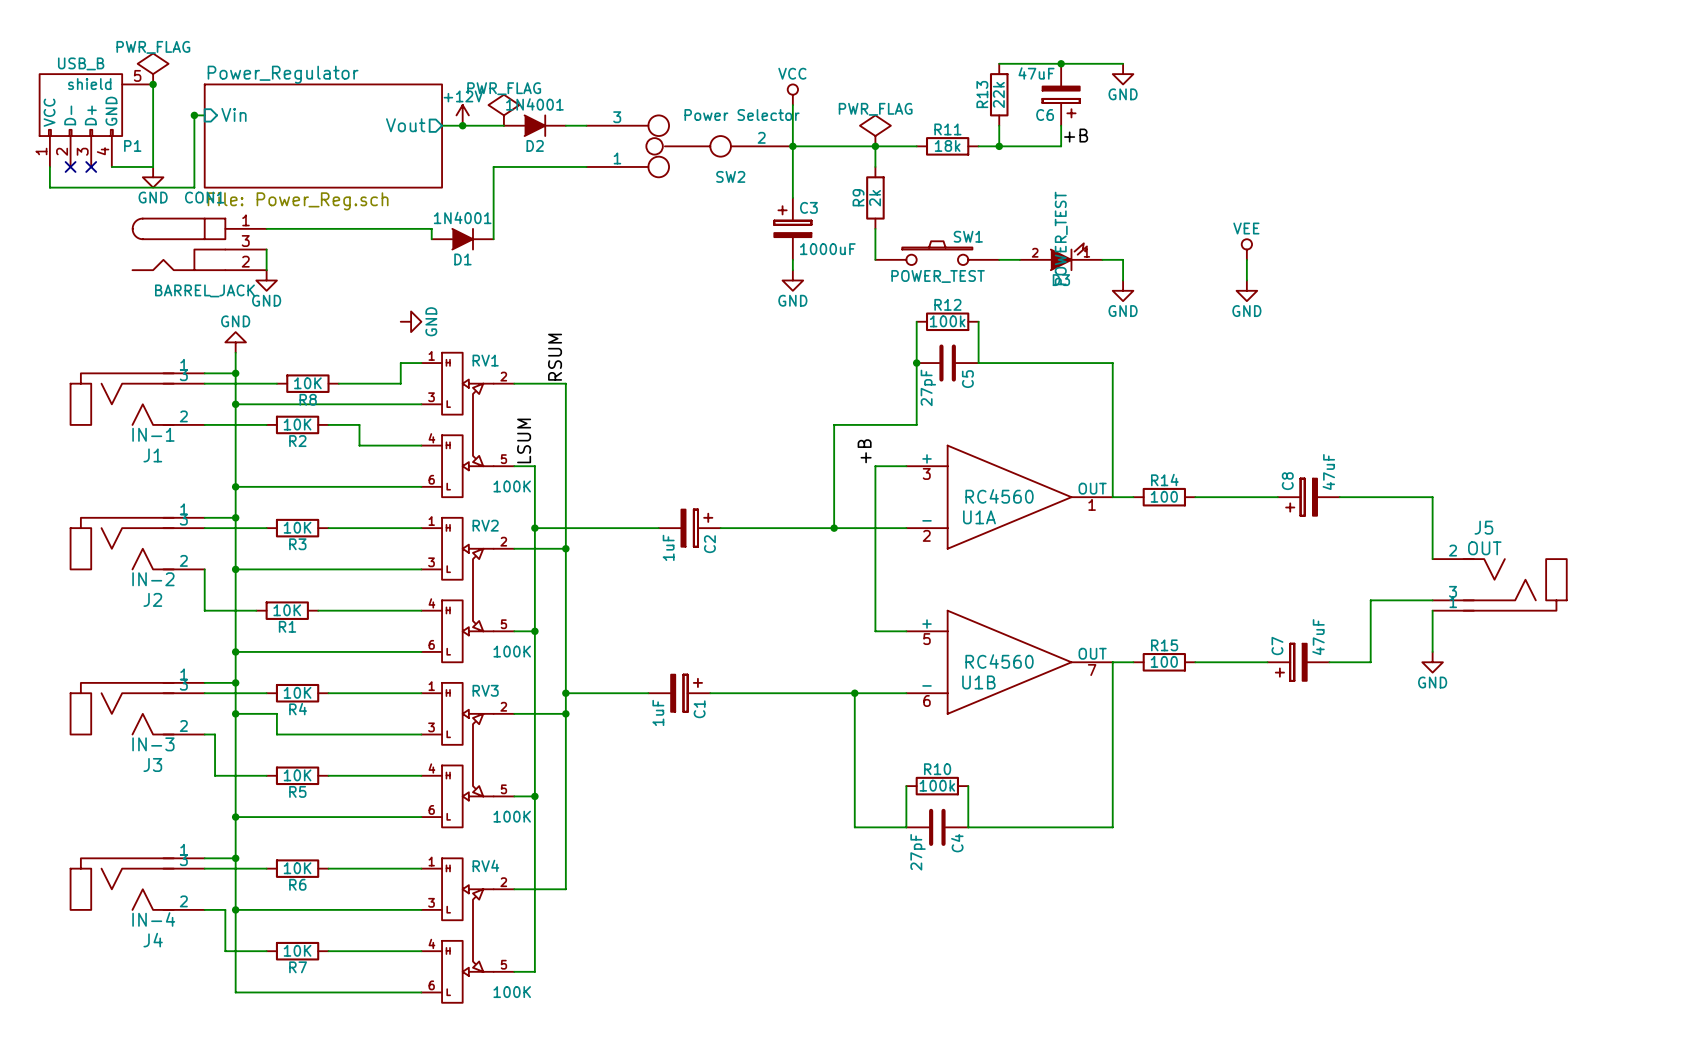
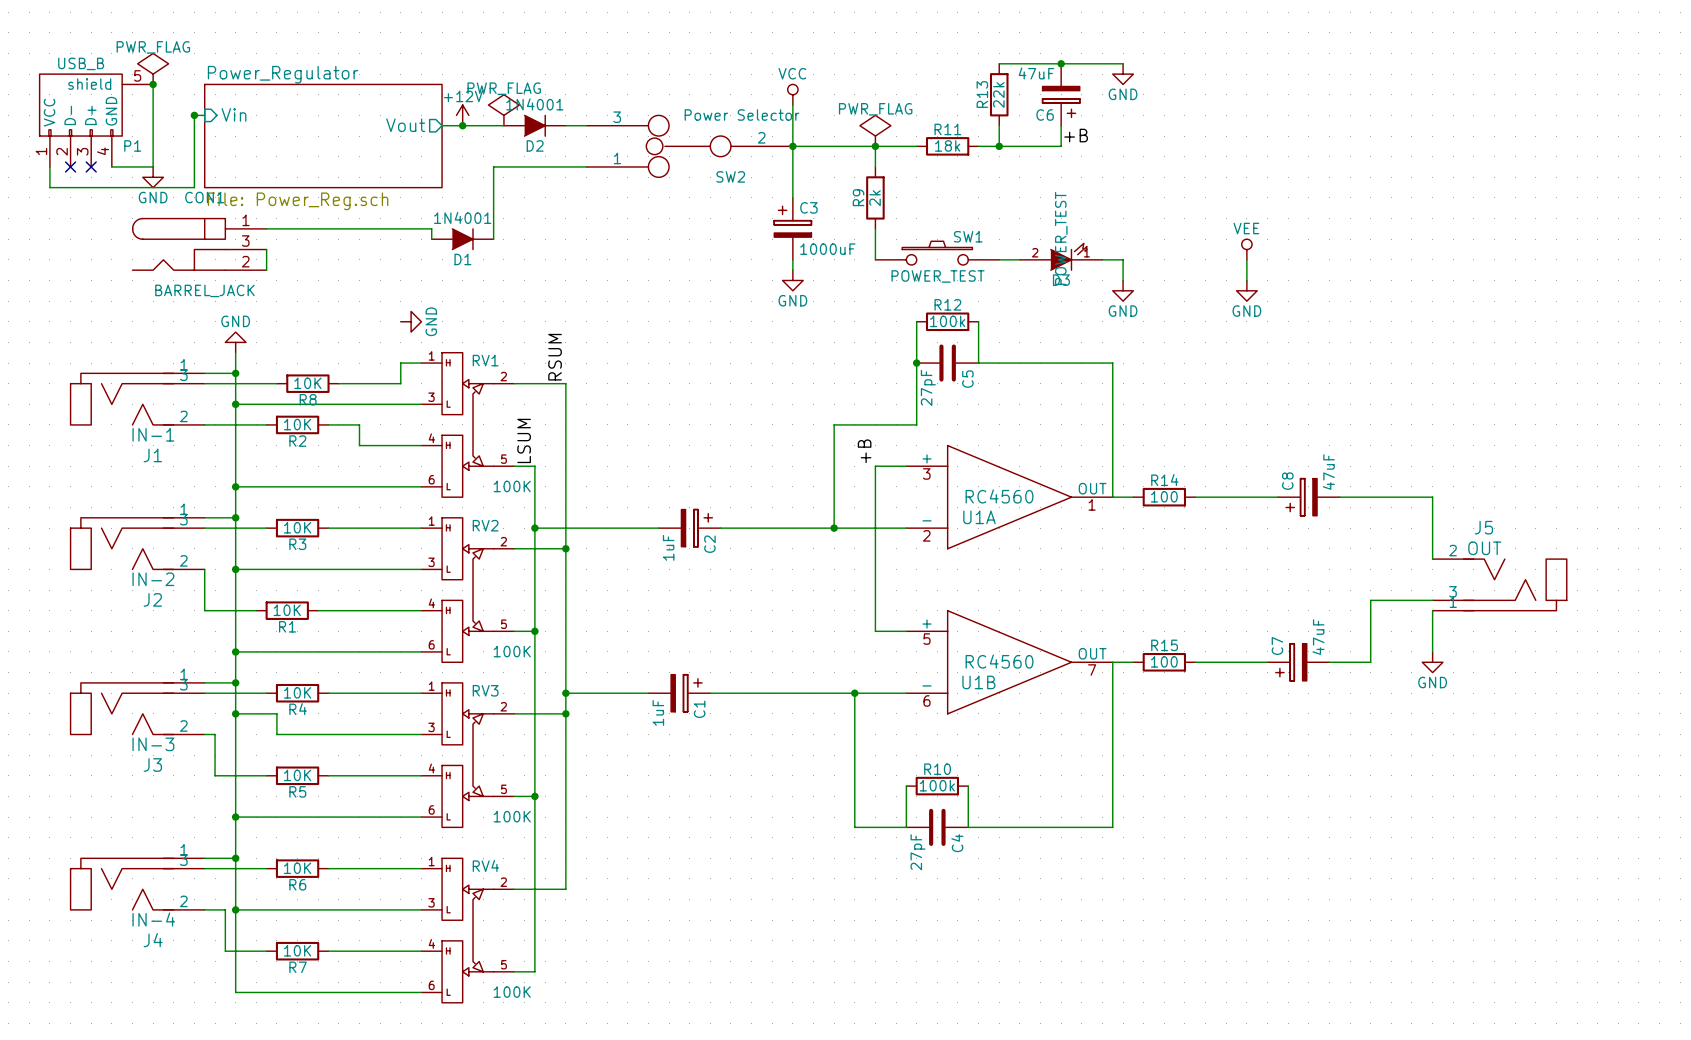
power symbol: GND (266, 280) -> none

